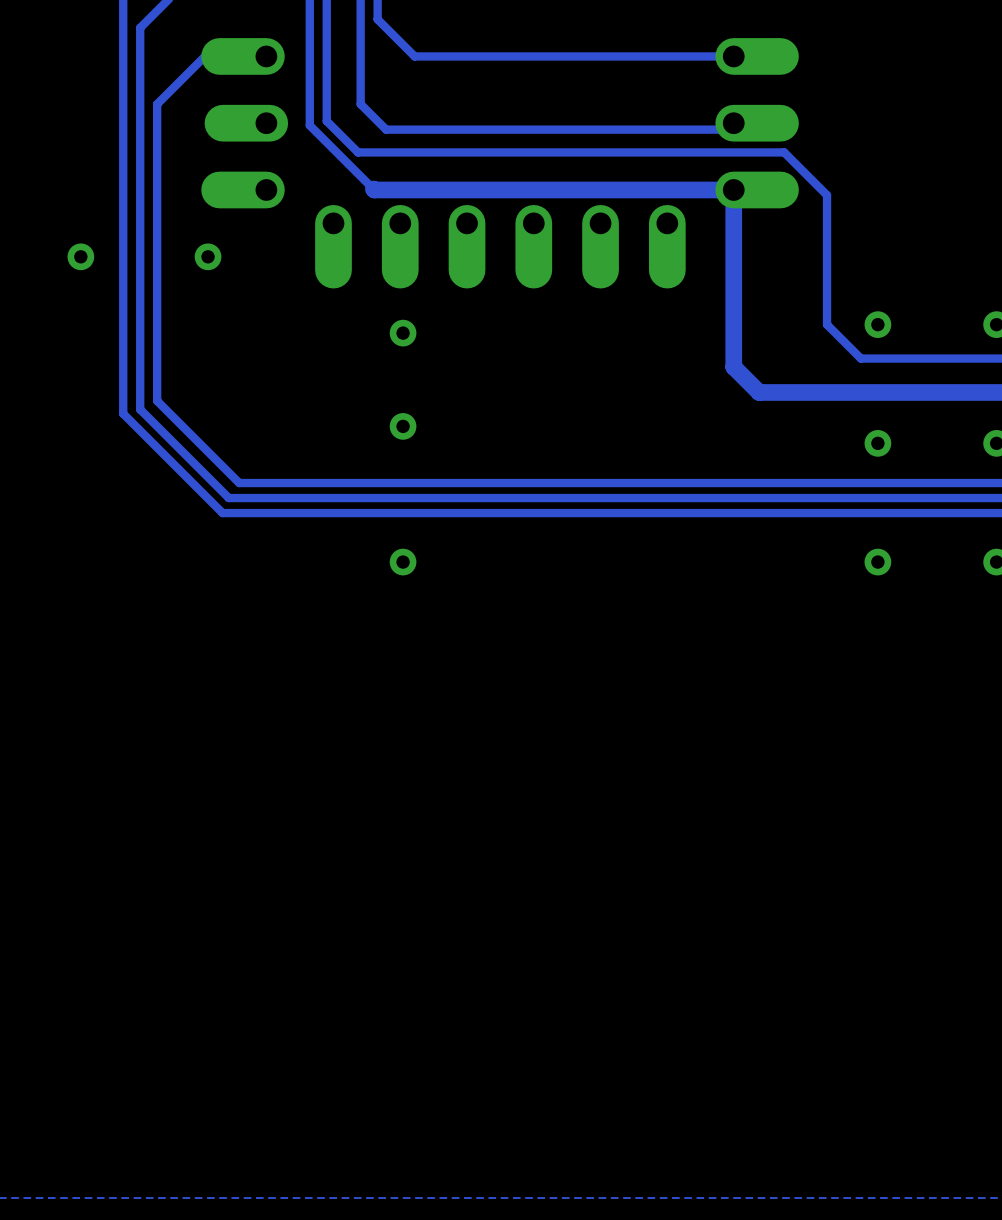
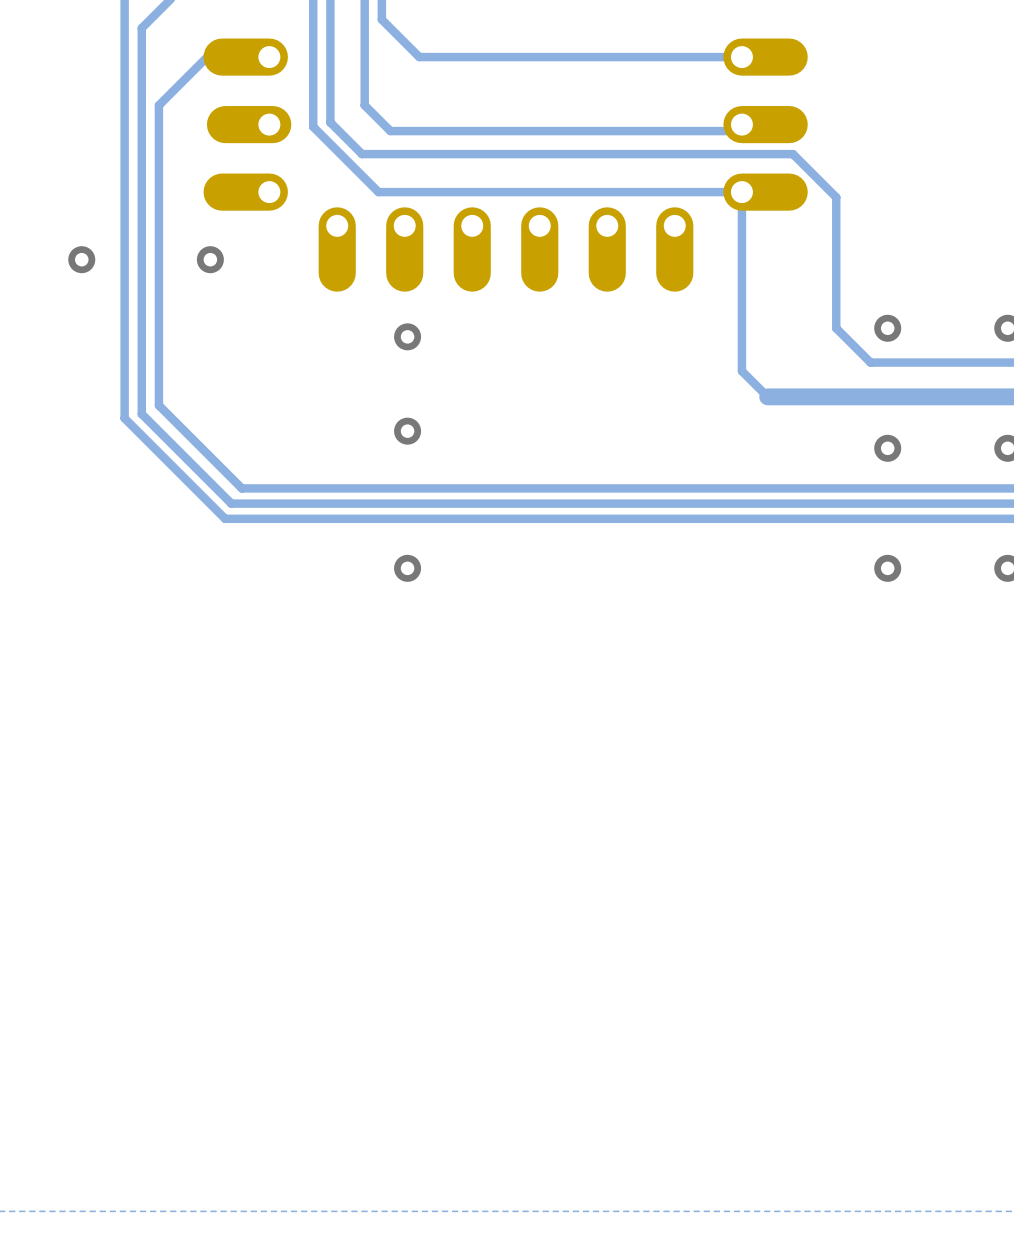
track width: thick (373, 188) (733, 189) (733, 367) (759, 392) -> thin (377, 191) (741, 192) (741, 371) (767, 396)

